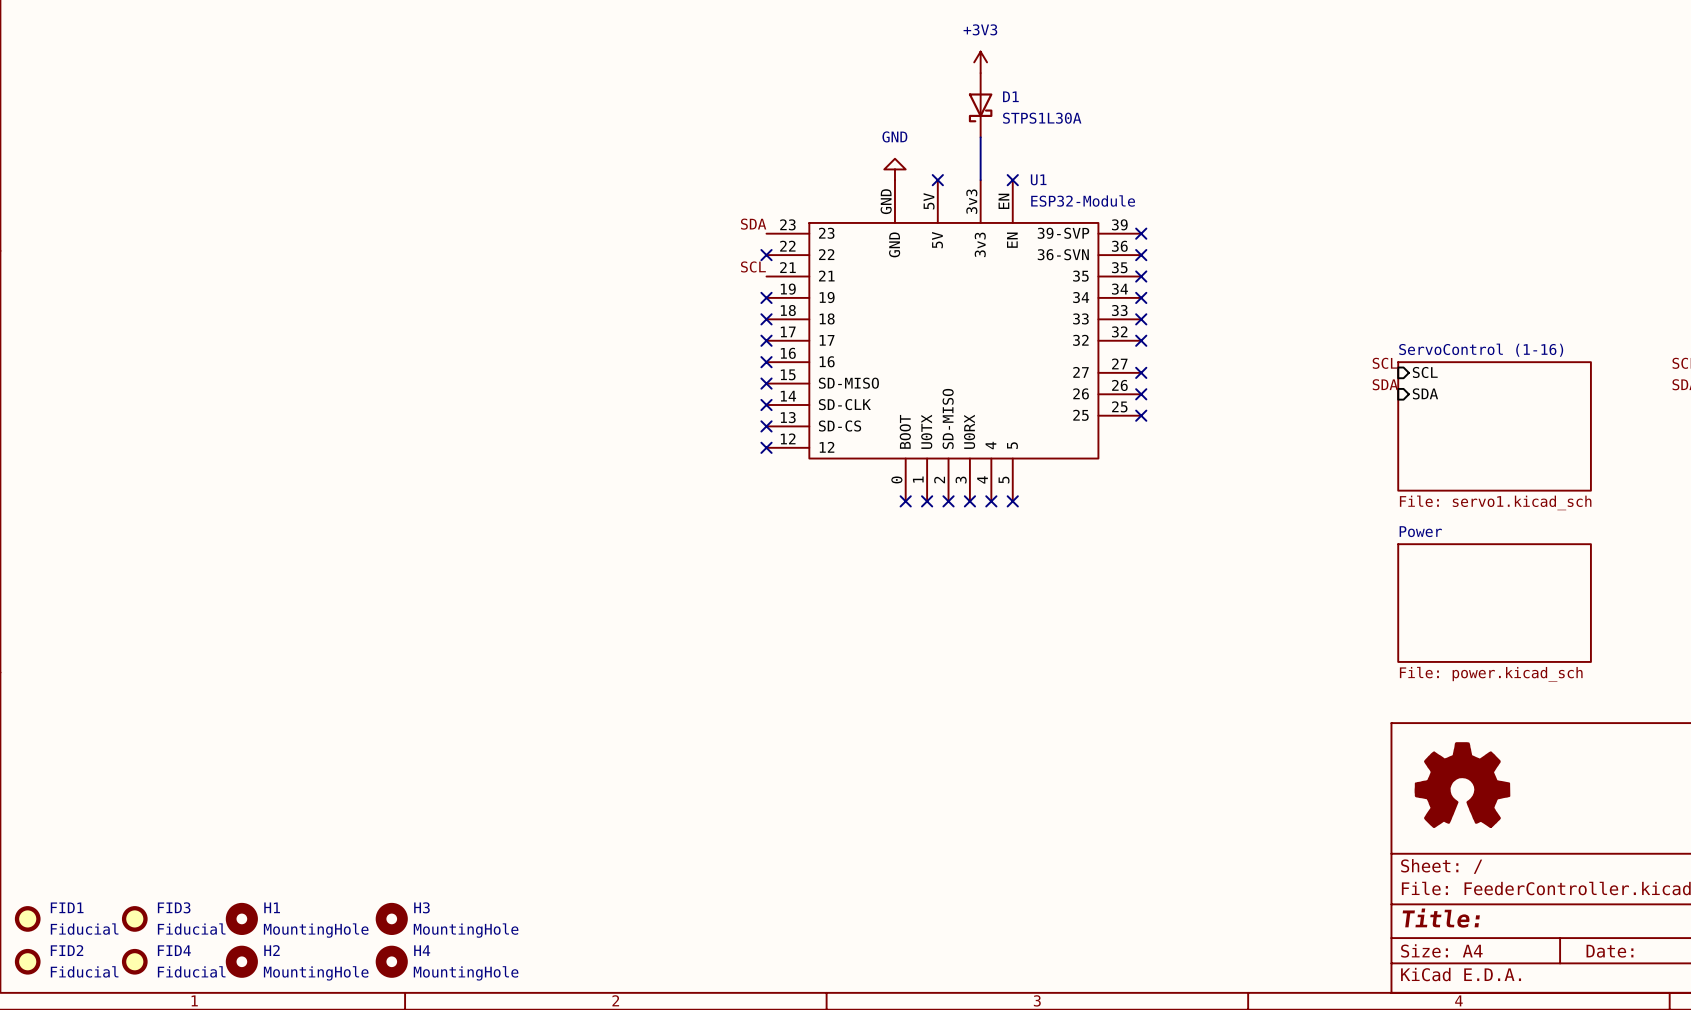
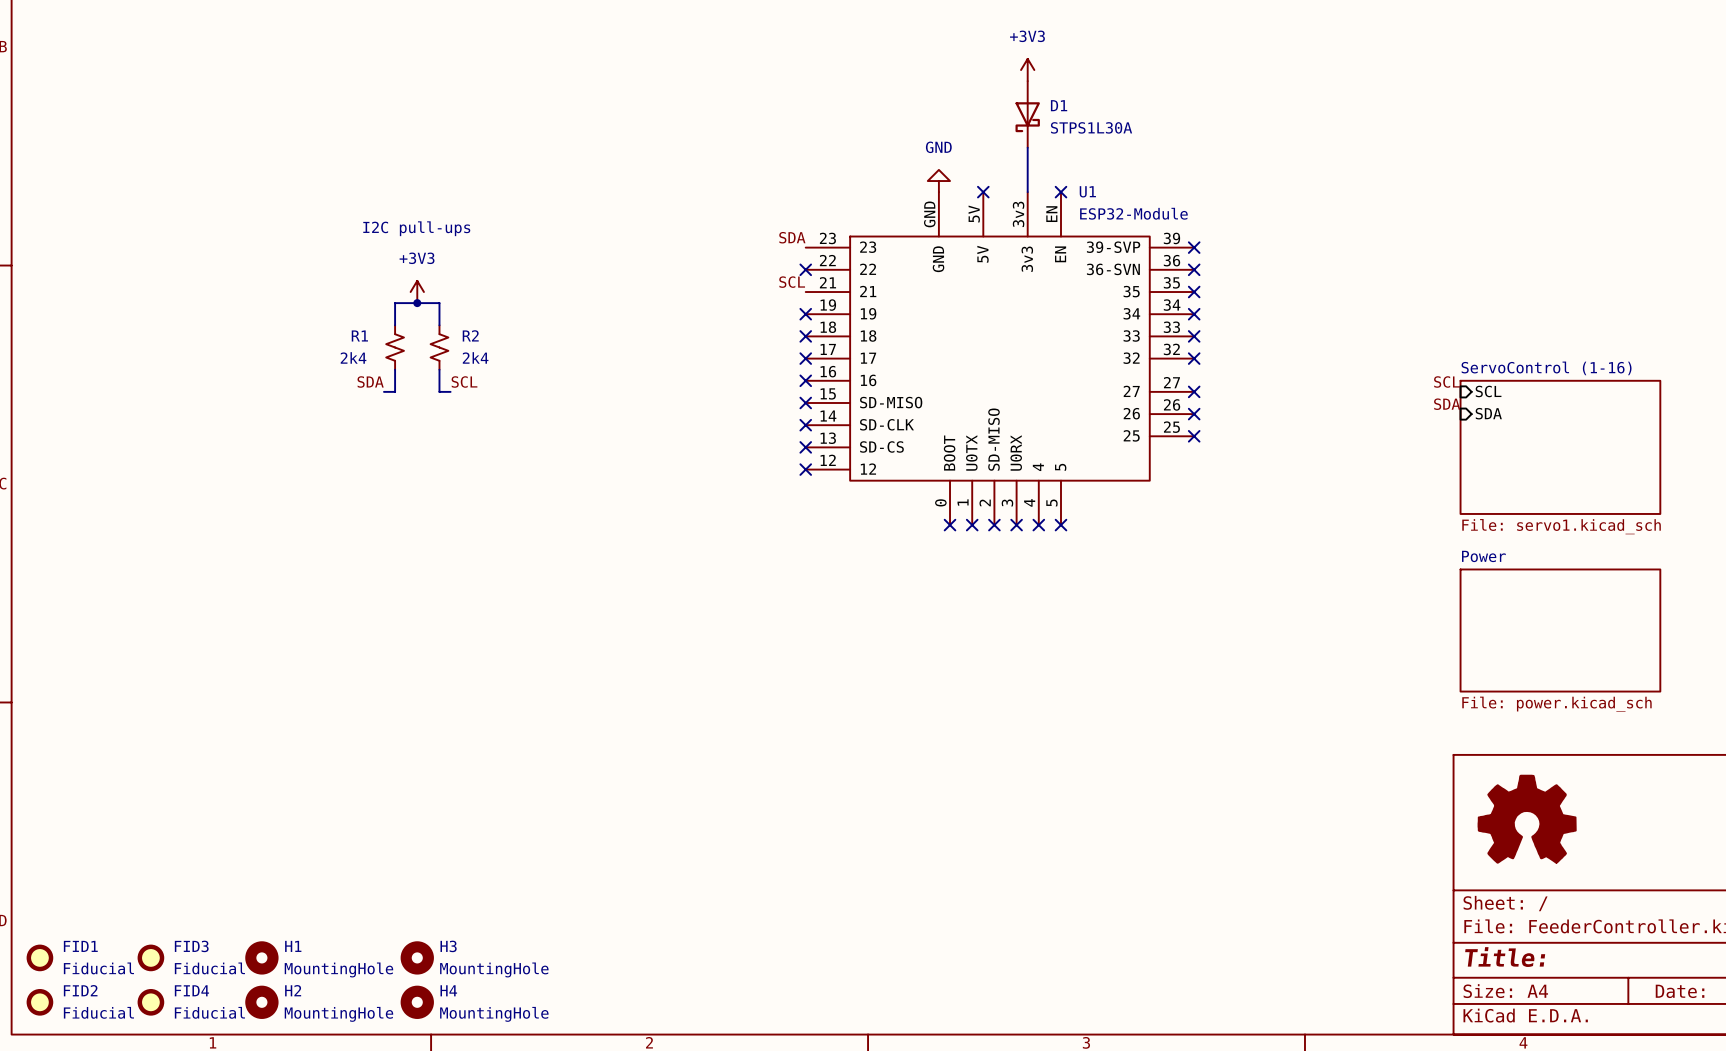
text: none -> I2C pull-ups (416, 228)
power symbol: none -> +3V3 (417, 292)
junction: none -> (417, 303)
wire: none -> (395, 325) (395, 303) (439, 303) (439, 325)
R1: none -> 2k4 (395, 347)
R2: none -> 2k4 (439, 347)
wire: none -> (395, 369) (395, 391) (383, 391)
wire: none -> (439, 369) (439, 391) (450, 391)
label: none -> SDA (370, 382)
label: none -> SCL (464, 382)

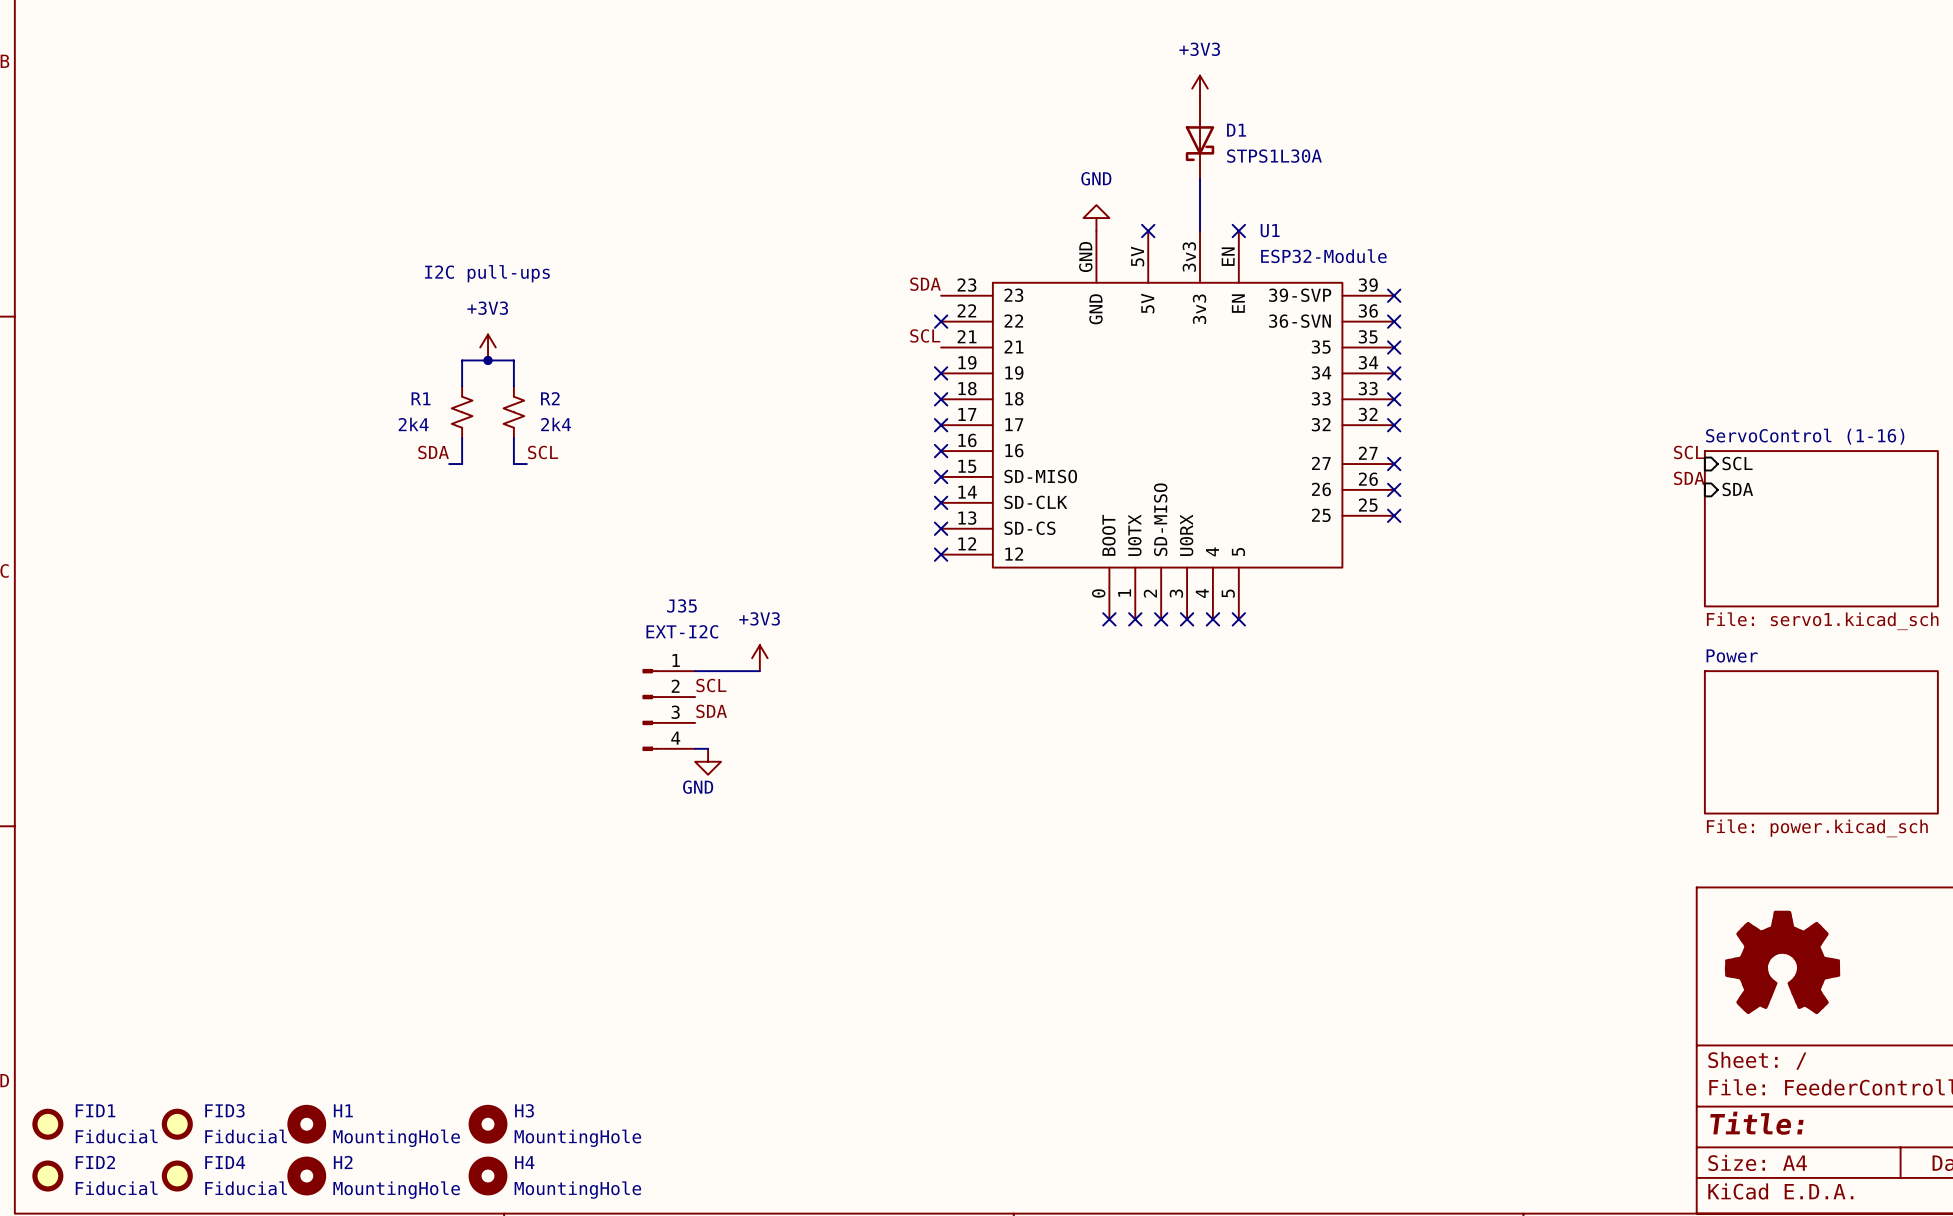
power symbol: none -> +3V3 (759, 658)
wire: none -> (695, 671) (759, 671)
label: none -> SCL (711, 685)
J35: none -> EXT-I2C (668, 709)
label: none -> SDA (711, 711)
wire: none -> (695, 748) (708, 748)
power symbol: none -> GND (708, 761)

